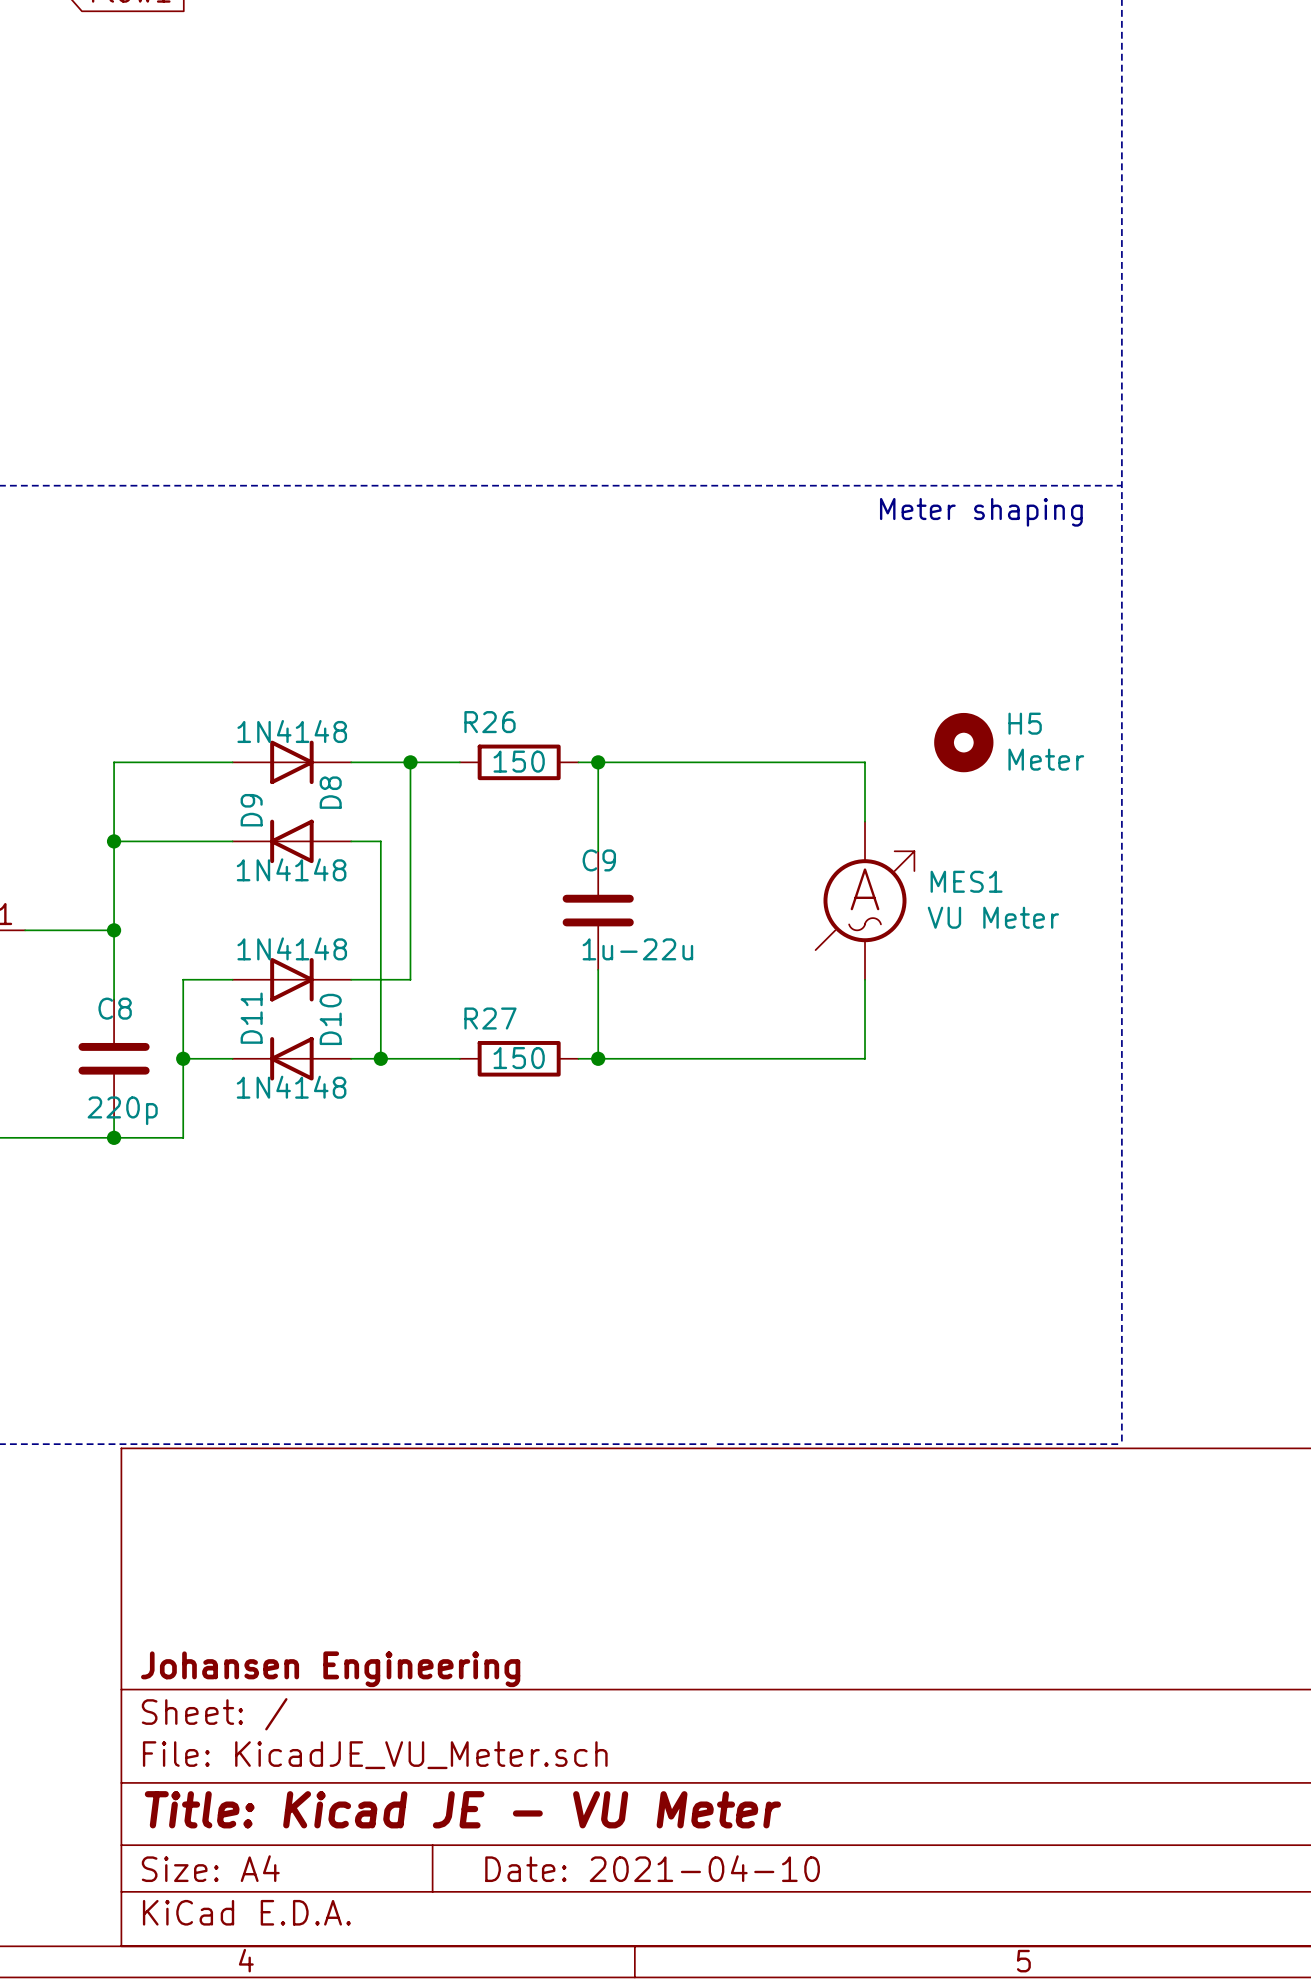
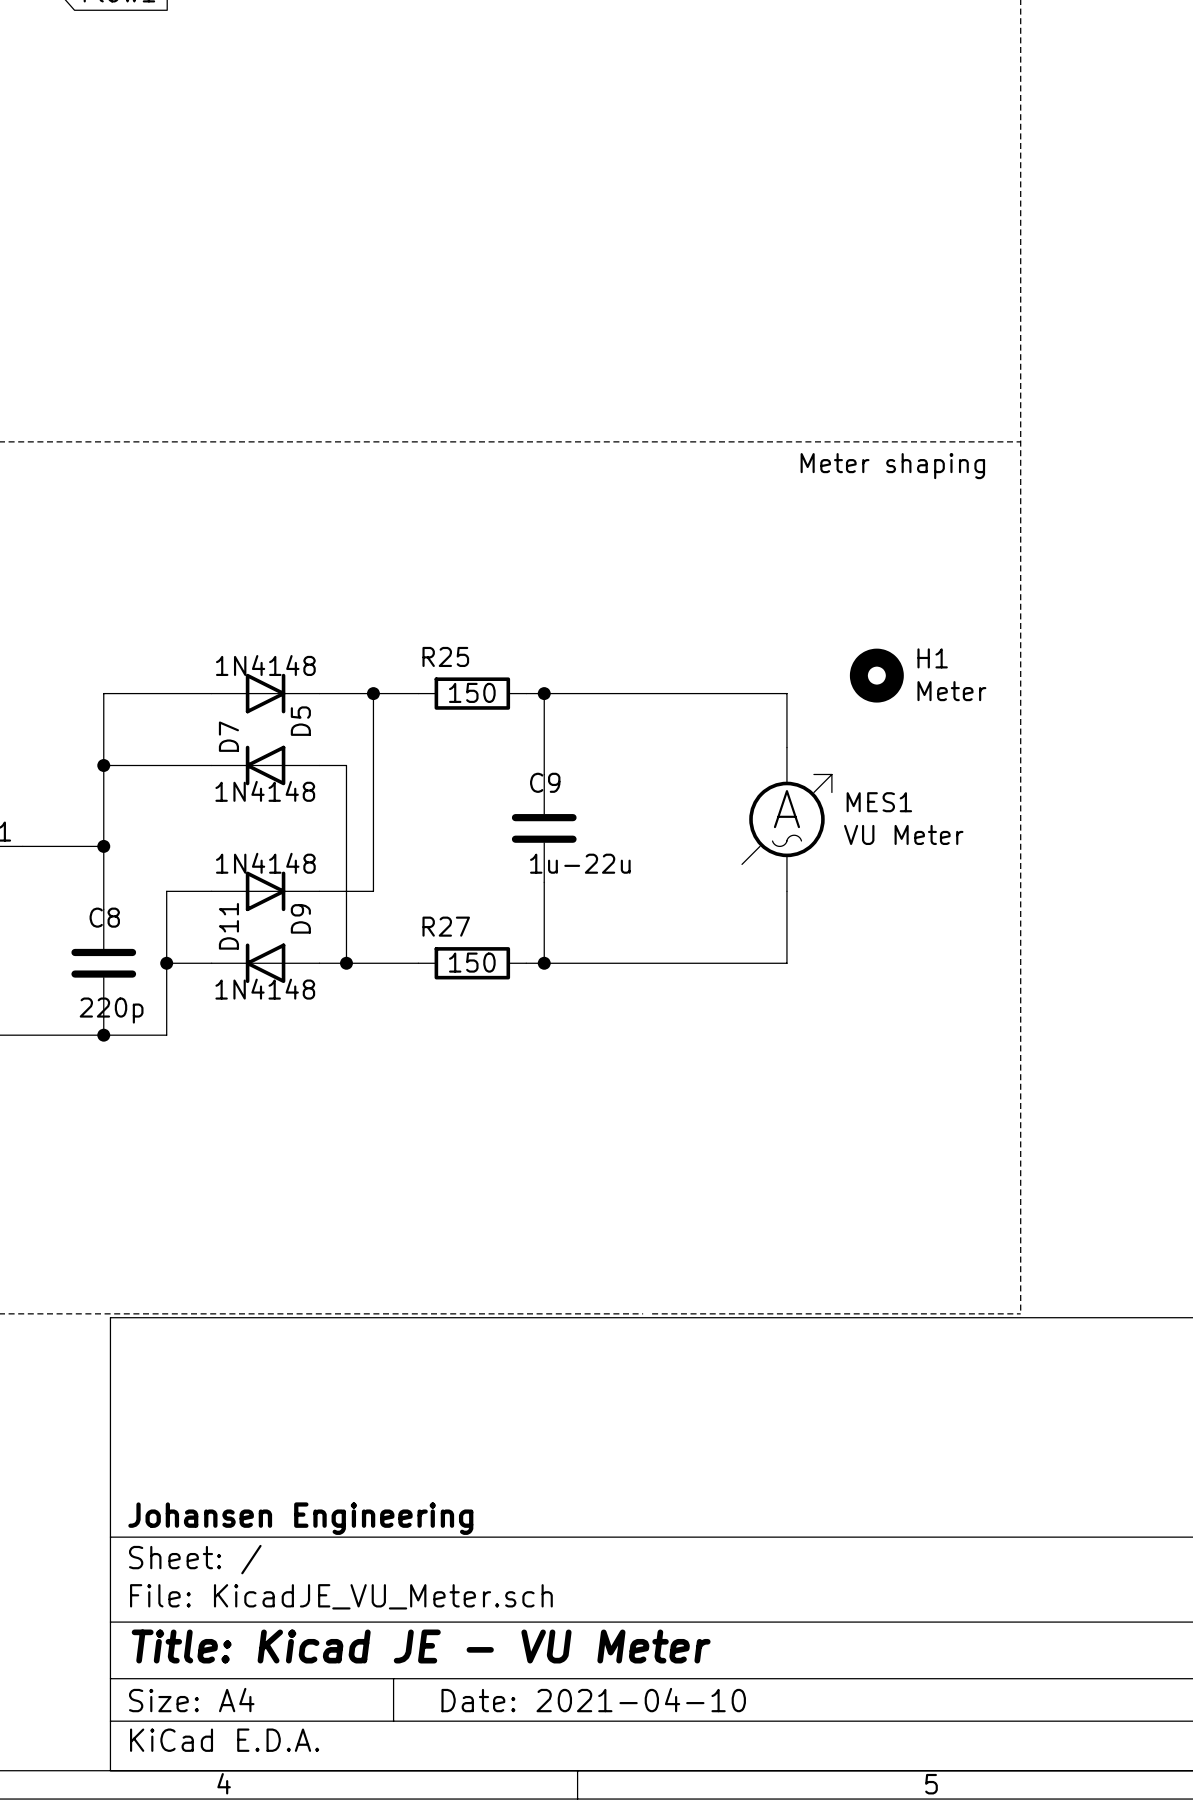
R26 name: R26 (489, 722) -> R25 (445, 656)
H5 name: H5 (1025, 723) -> H1 (932, 658)
D8 name: D8 (330, 792) -> D5 (300, 721)
D9 name: D9 (251, 810) -> D7 (228, 736)
D10 name: D10 (330, 1019) -> D9 (300, 918)

